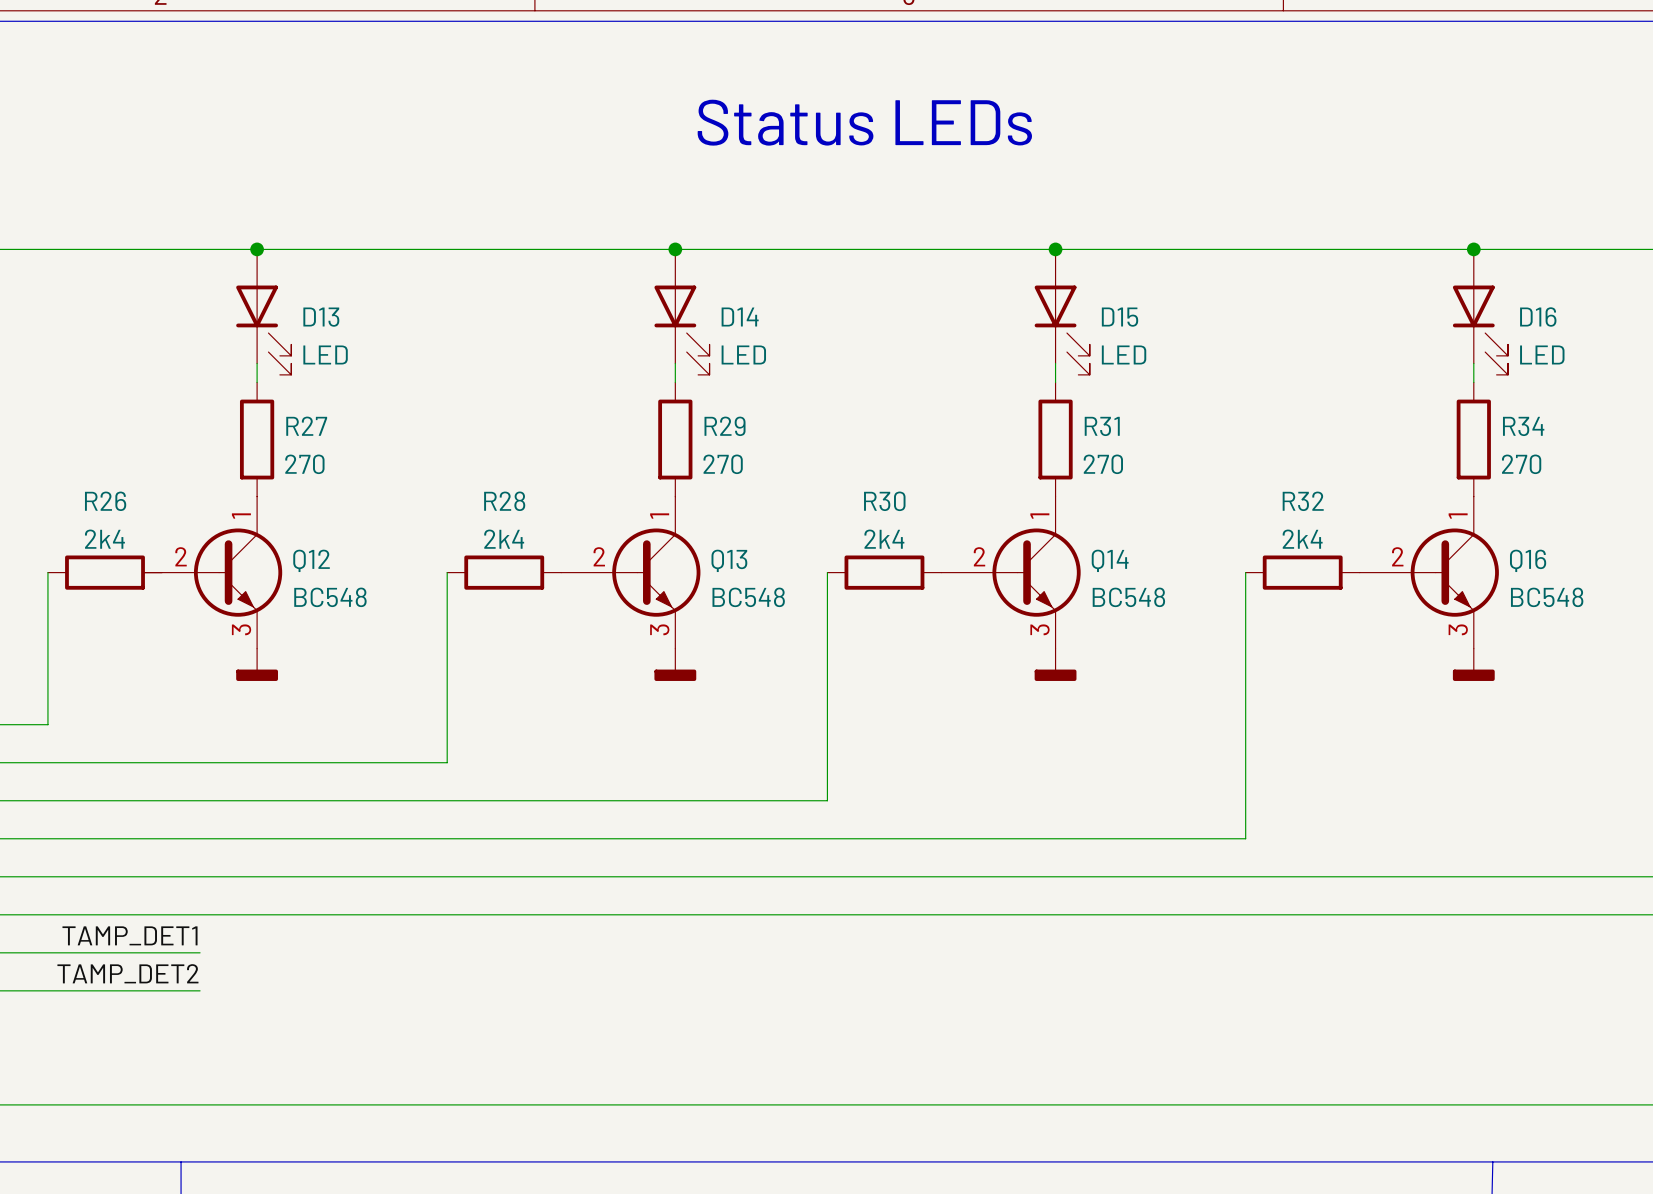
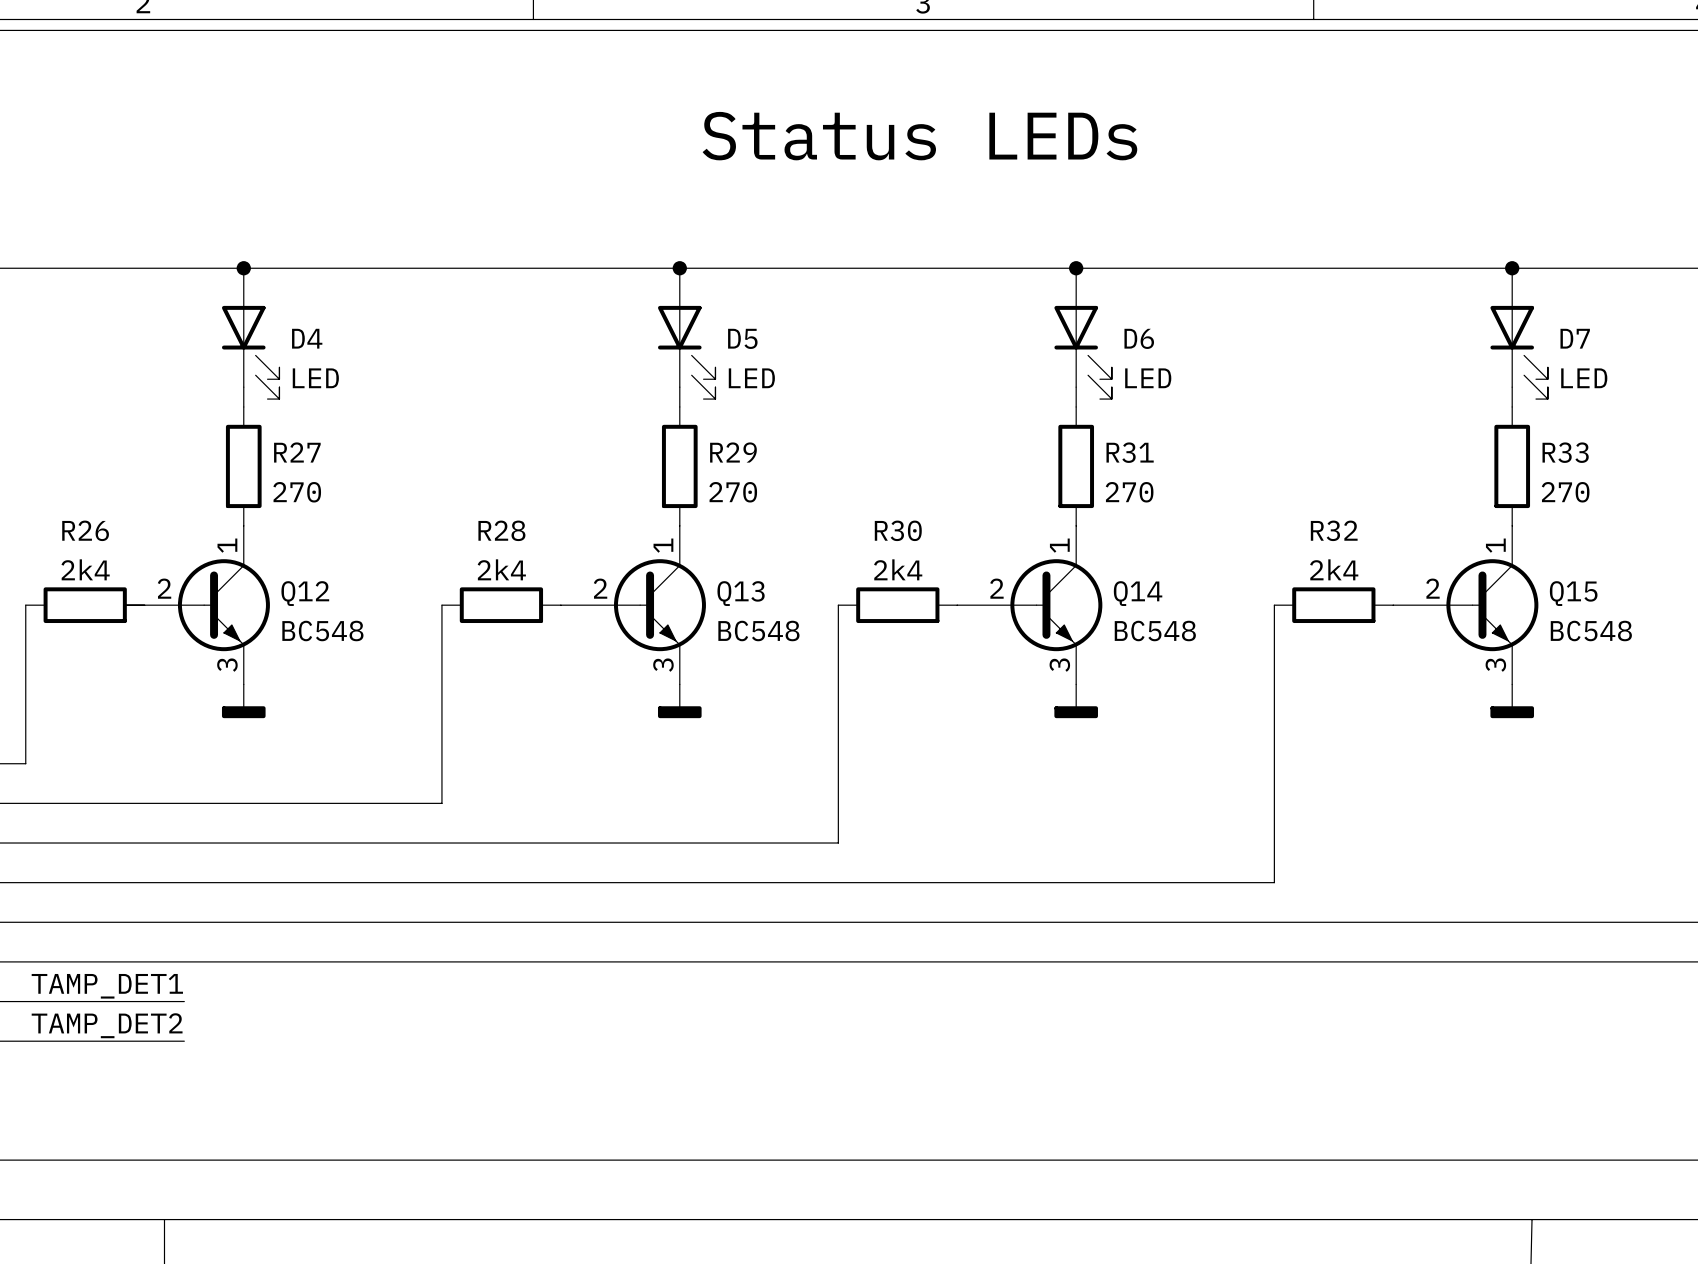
D16 name: D16 (1538, 316) -> D7 (1575, 338)
D13 name: D13 (321, 317) -> D4 (307, 338)
D14 name: D14 (740, 317) -> D5 (742, 338)
D15 name: D15 (1120, 317) -> D6 (1139, 338)
R34 name: R34 (1523, 426) -> R33 (1565, 452)
Q16 name: Q16 (1528, 560) -> Q15 (1573, 593)

